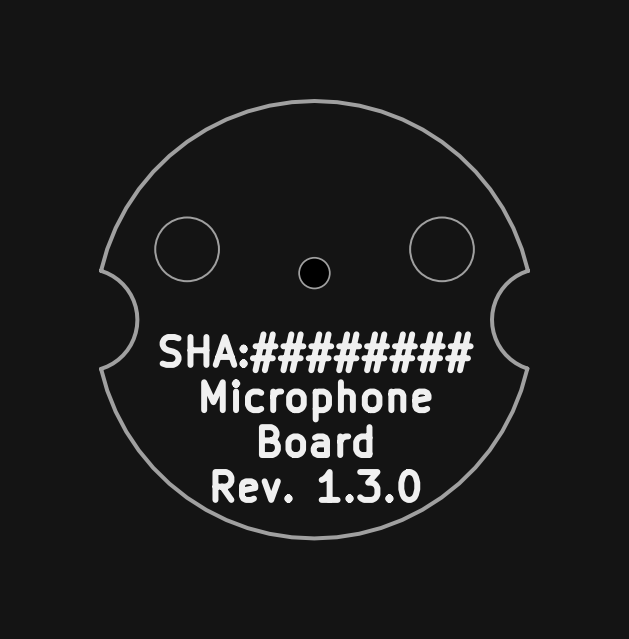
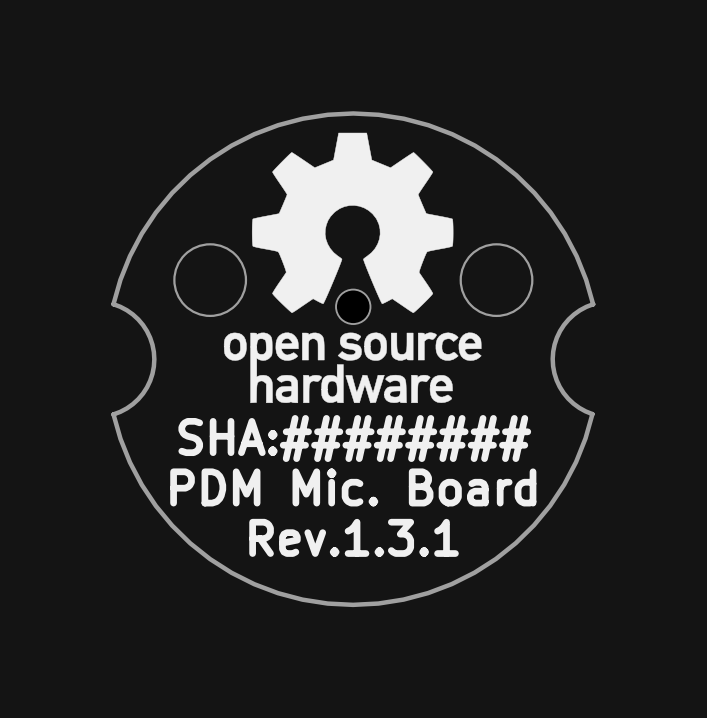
drawing: none -> [223, 132, 482, 404]
text position: SHA:######## (316, 352) -> SHA:######## (354, 438)
text: Microphone (316, 400) -> none
text: Board (315, 441) -> PDM Mic. Board (353, 487)
text: Rev. 1.3.0 (316, 485) -> Rev.1.3.1 (354, 537)

